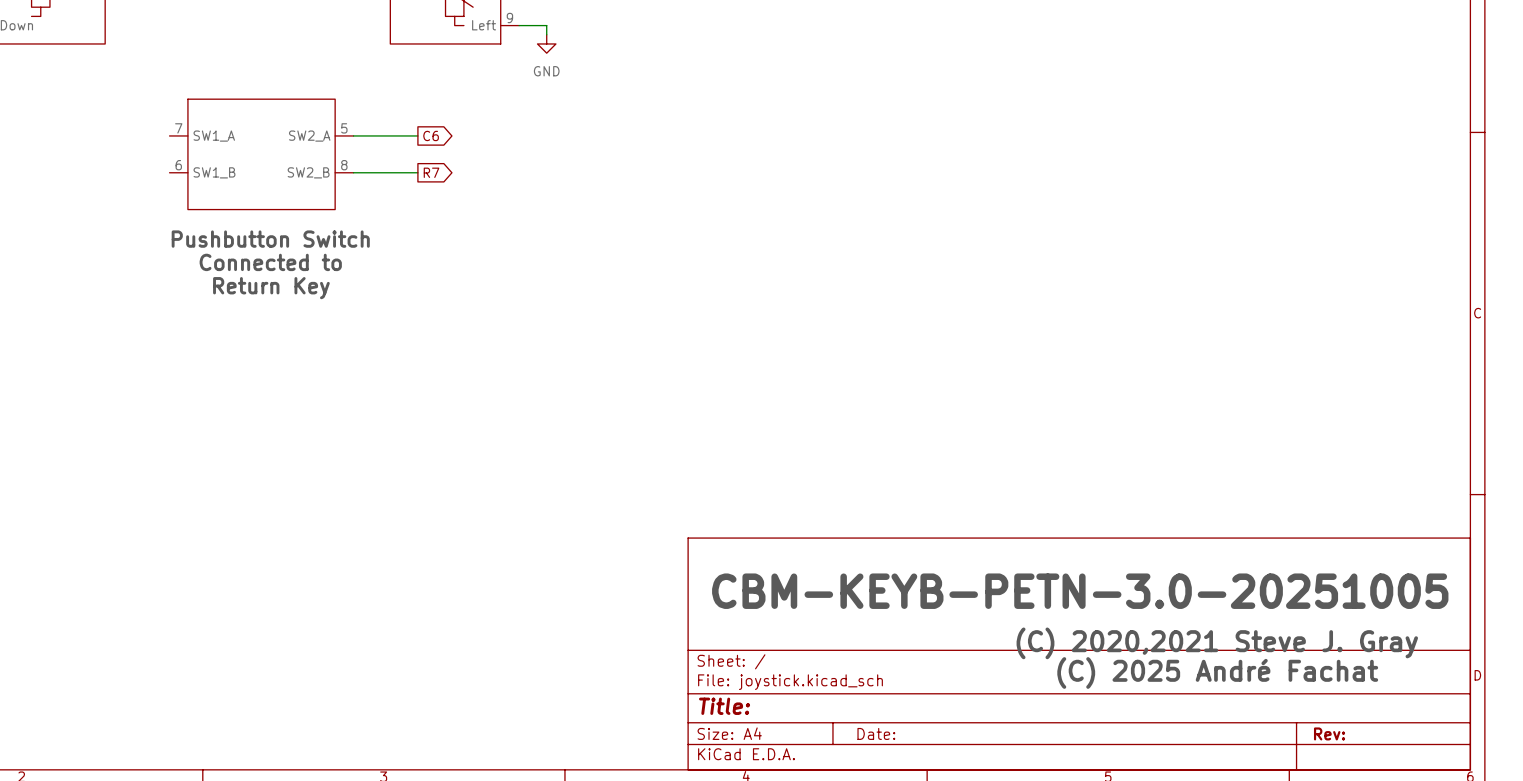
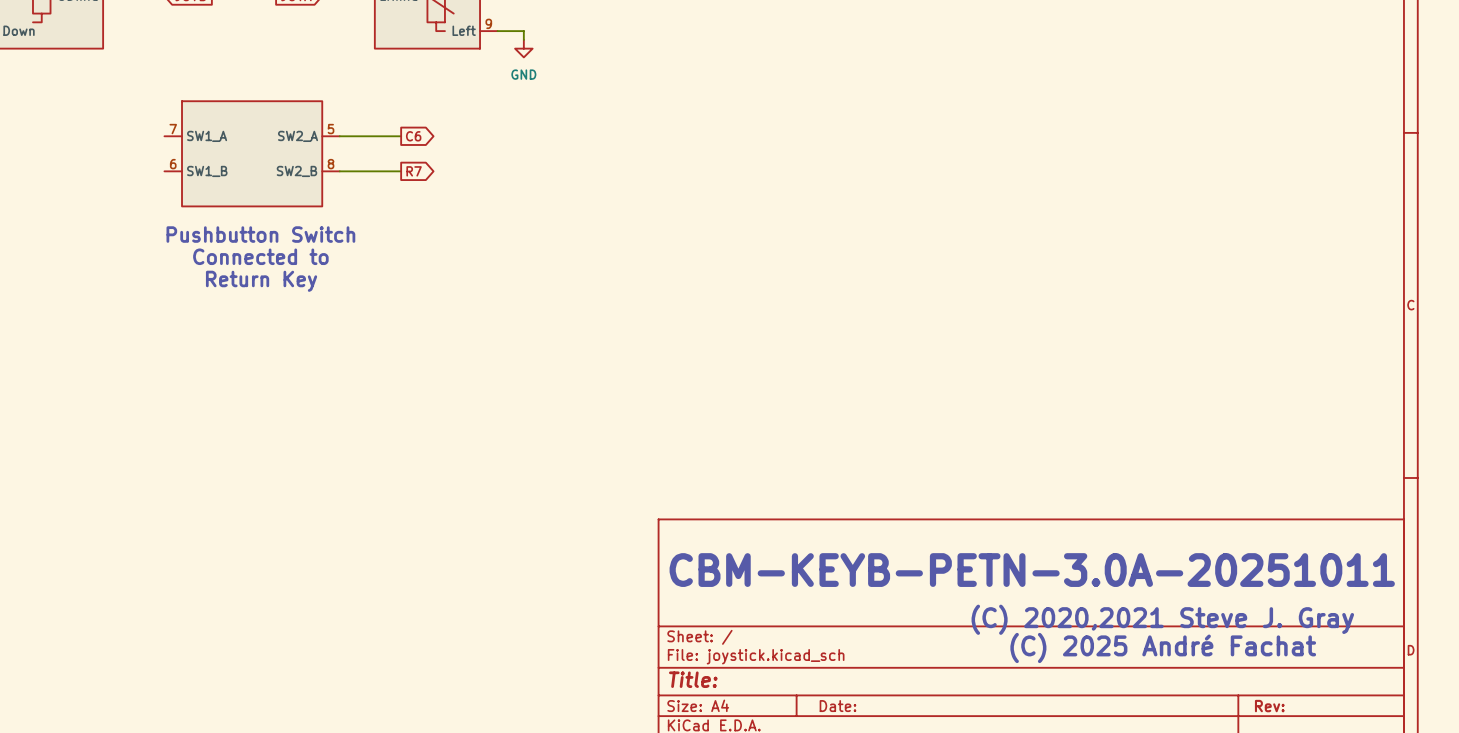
text: CBM-KEYB-PETN-3.0-20251005 (1080, 591) -> CBM-KEYB-PETN-3.0A-20251011 (1032, 570)

